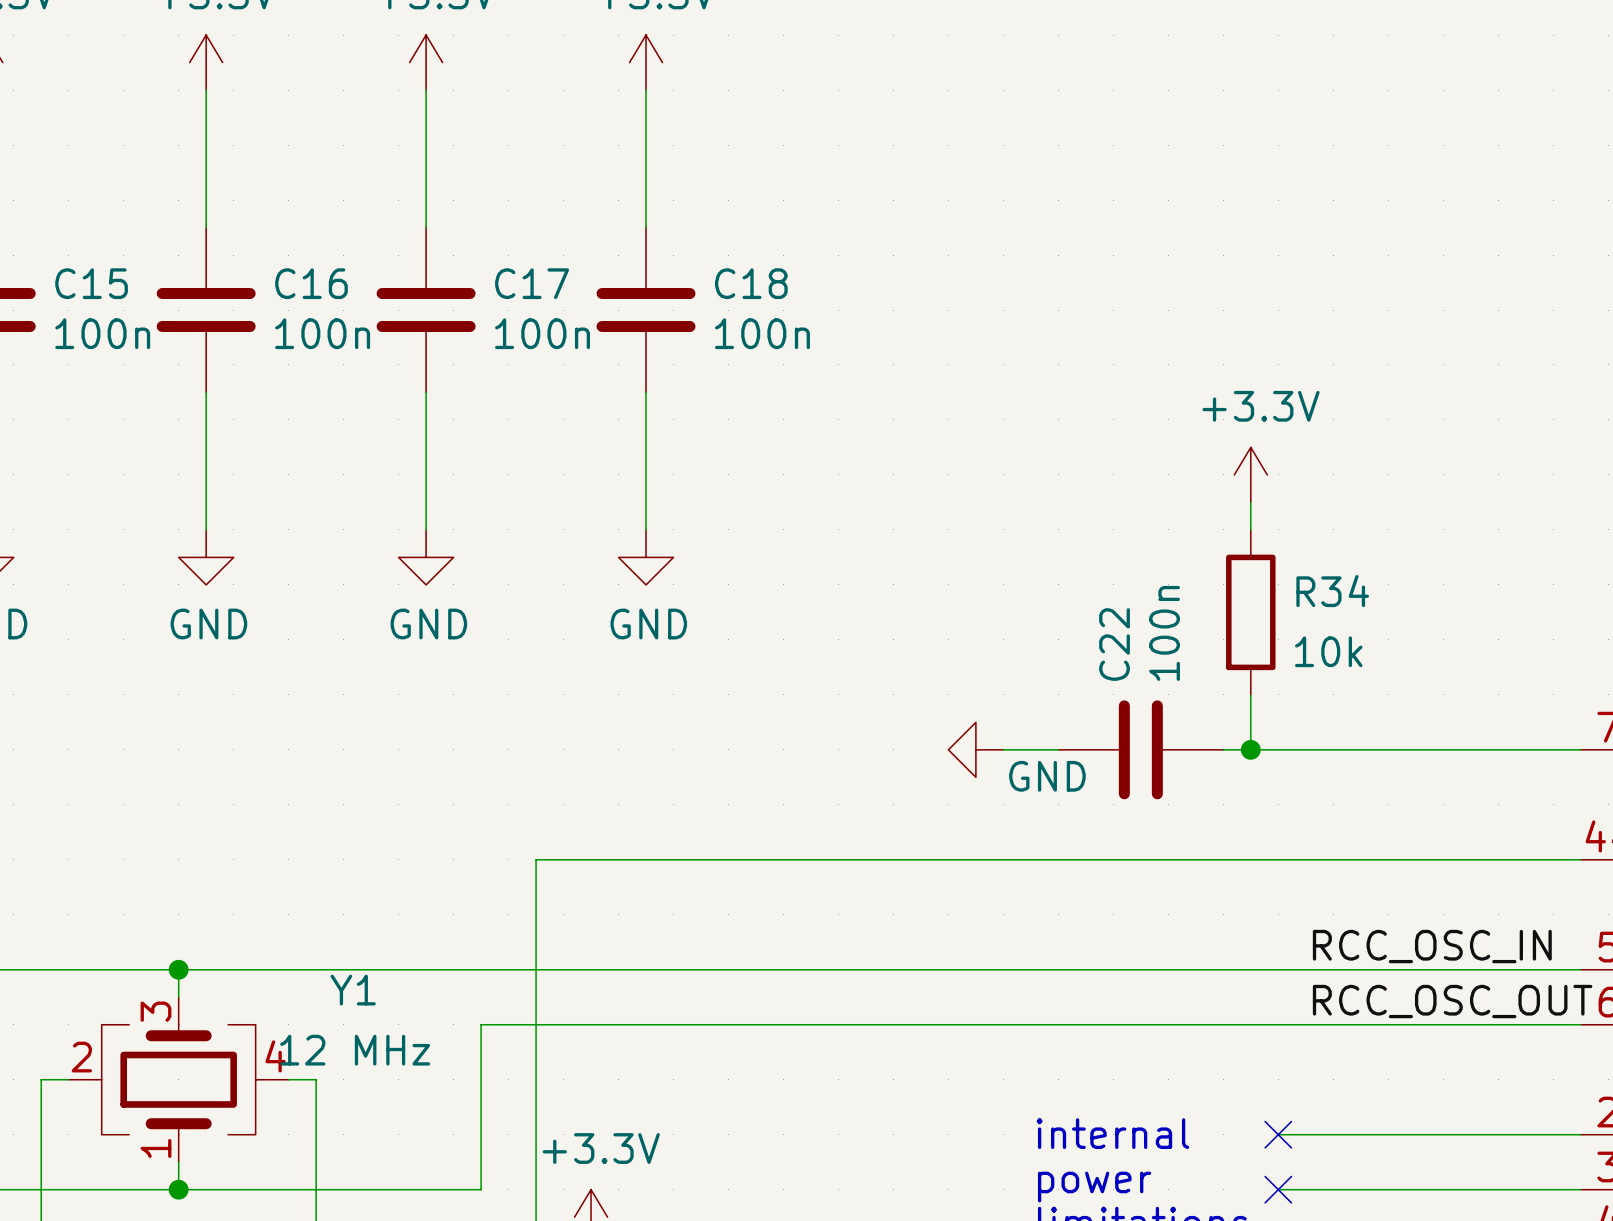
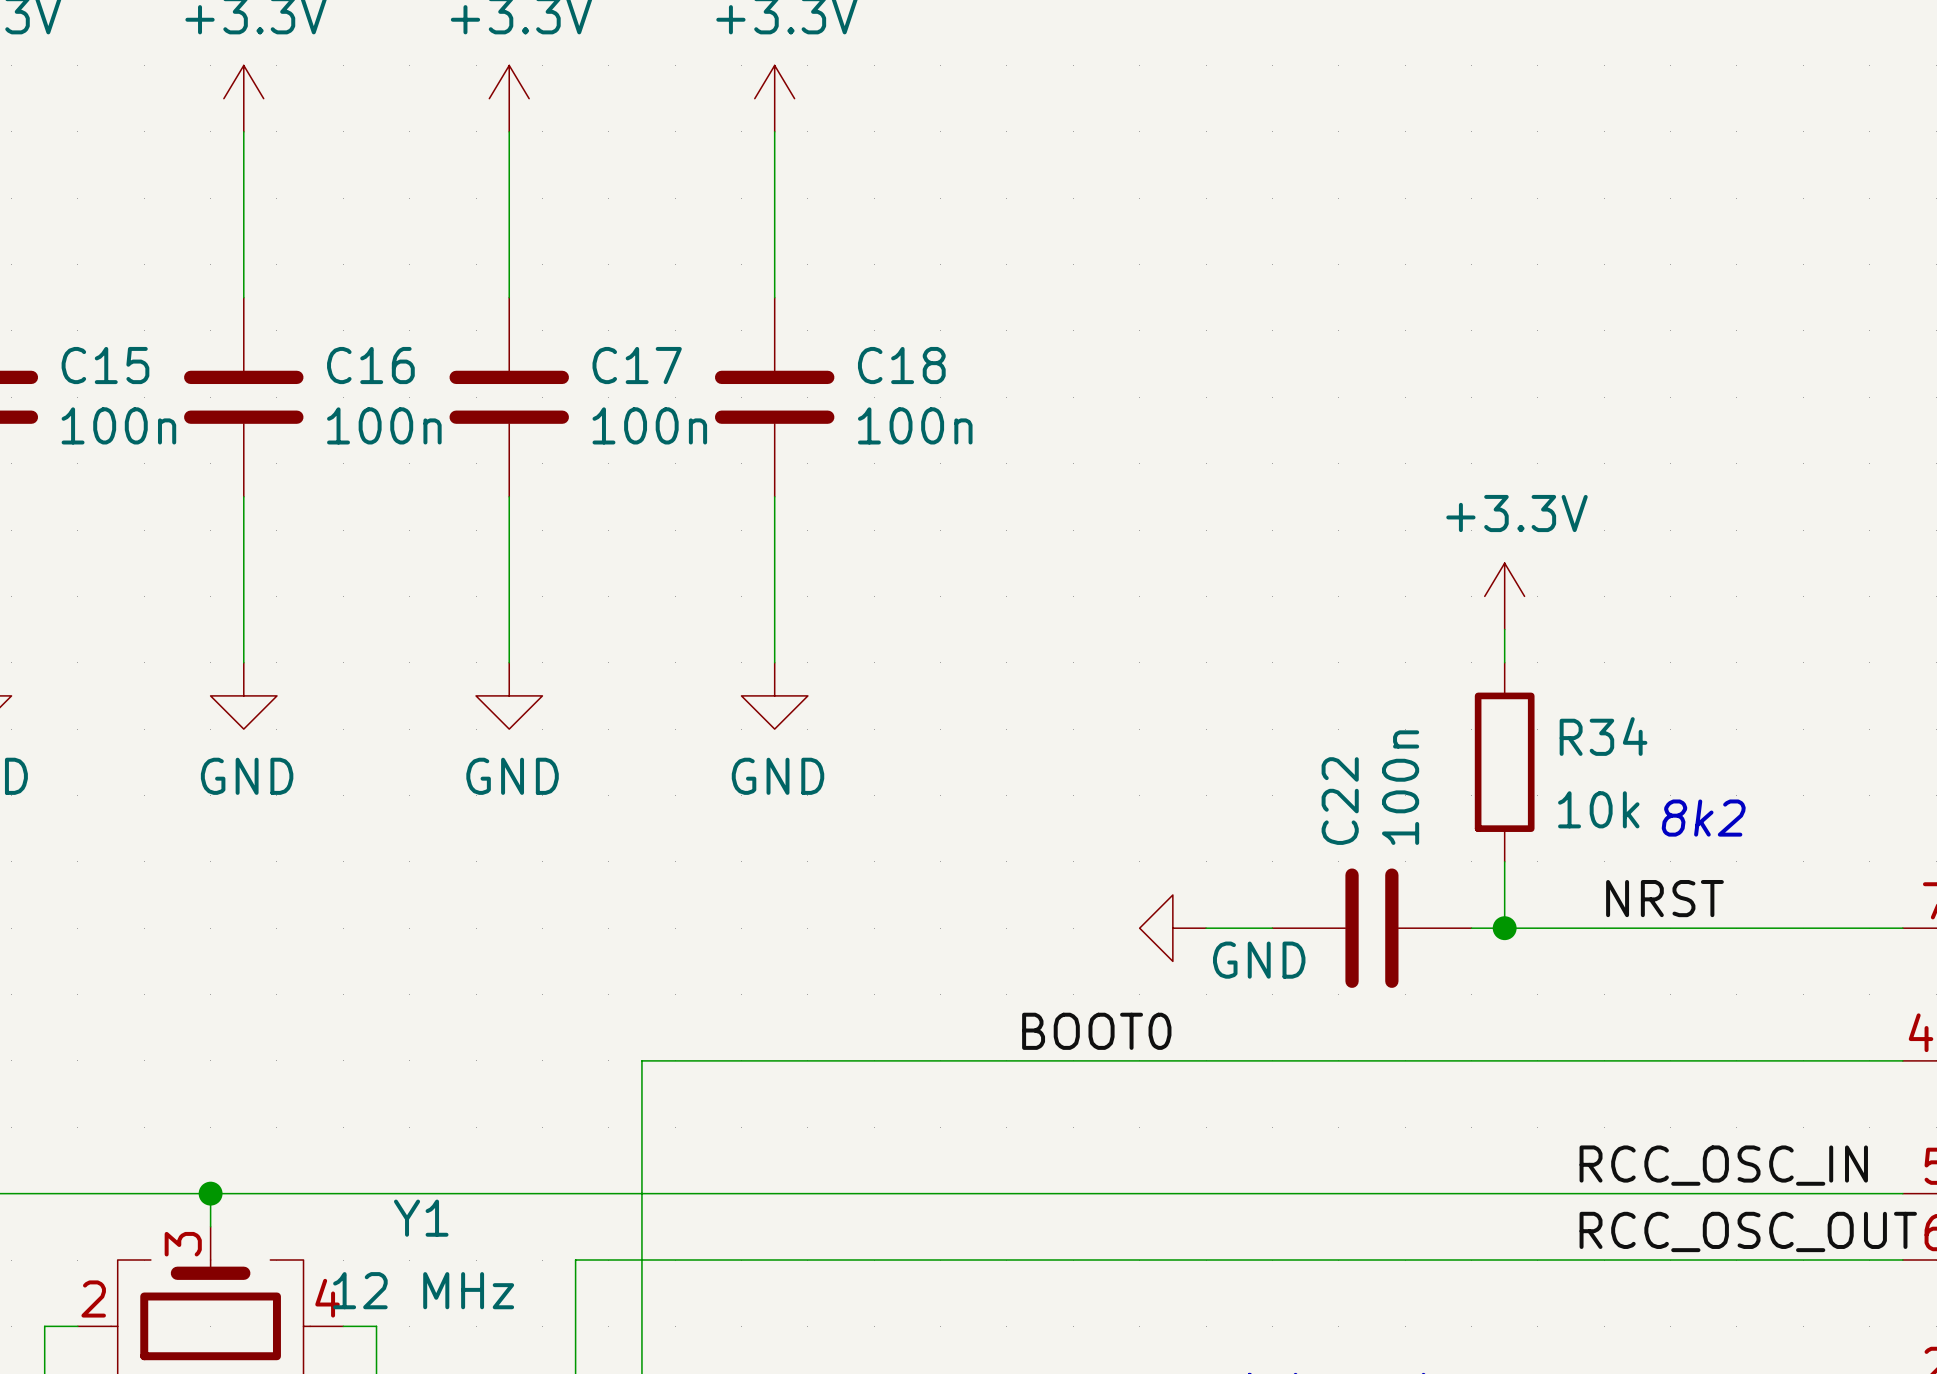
text: none -> 8k2 (1703, 818)
label: none -> NRST (1664, 898)
label: none -> BOOT0 (1096, 1031)

